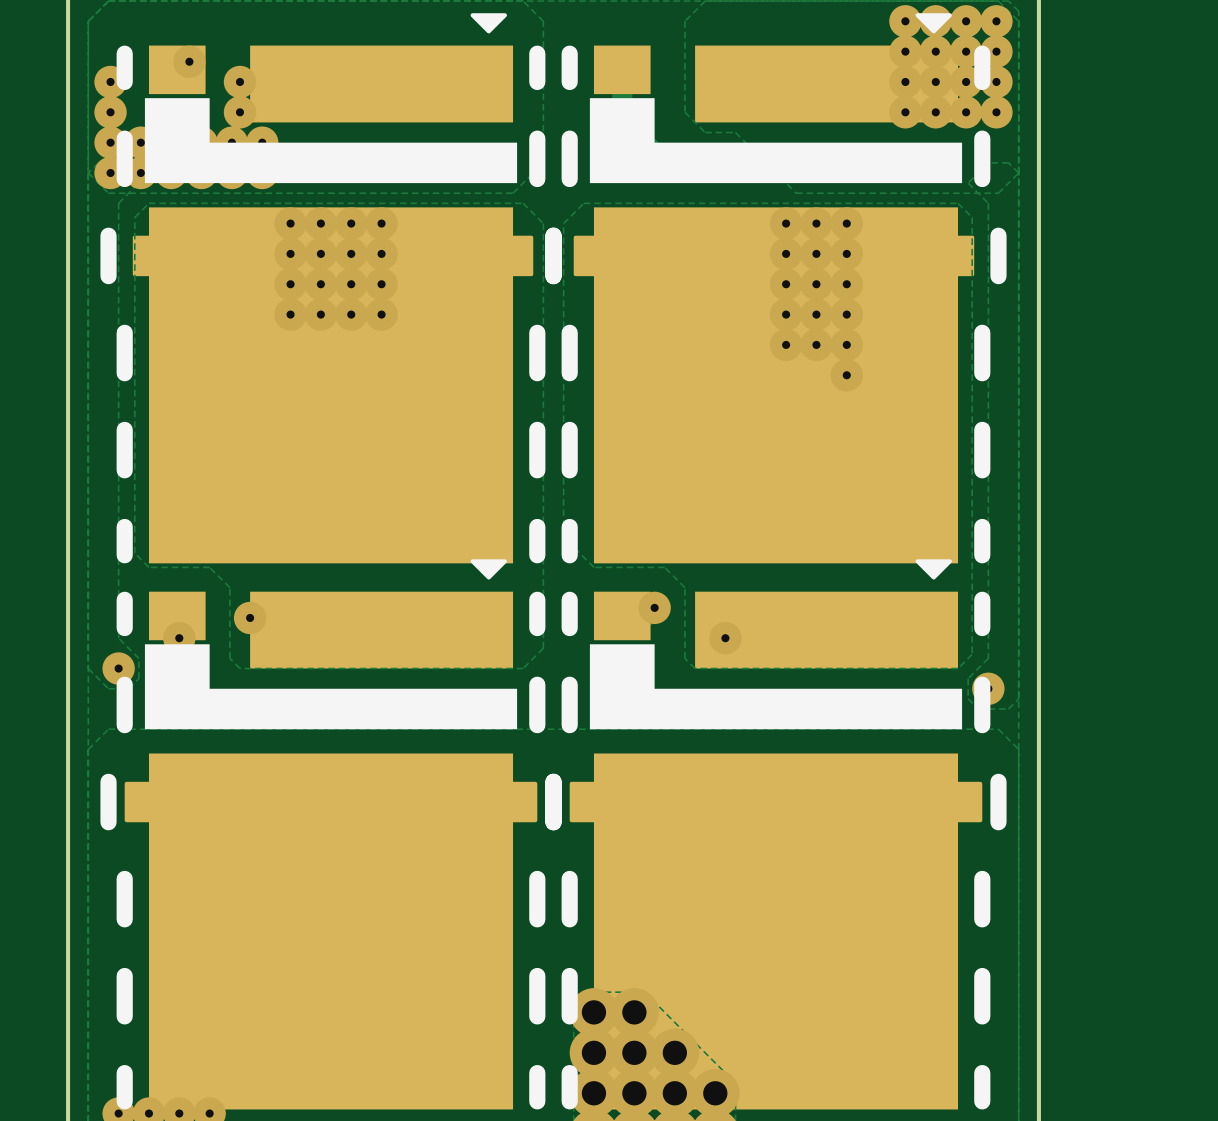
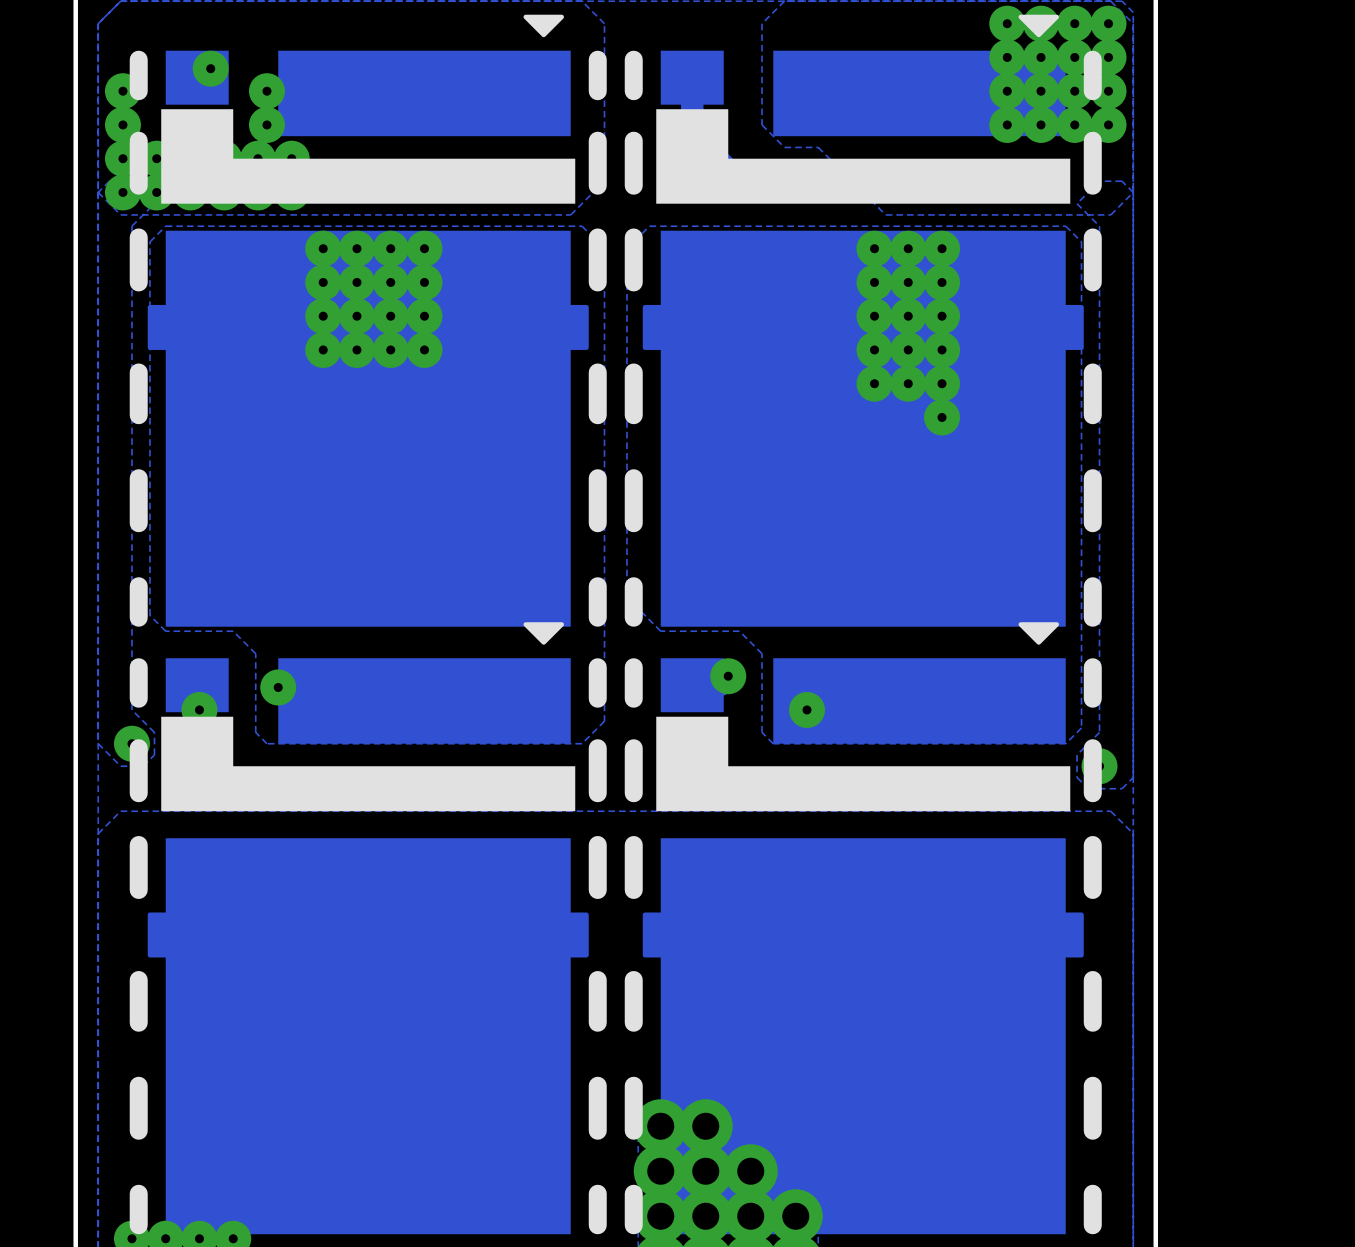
part footprint: [100, 13, 562, 564] -> [129, 14, 607, 627]
part footprint: [545, 13, 1007, 564] -> [624, 14, 1102, 627]
part footprint: [100, 559, 562, 1110] -> [129, 622, 607, 1235]
part footprint: [545, 559, 1007, 1110] -> [624, 622, 1102, 1235]

